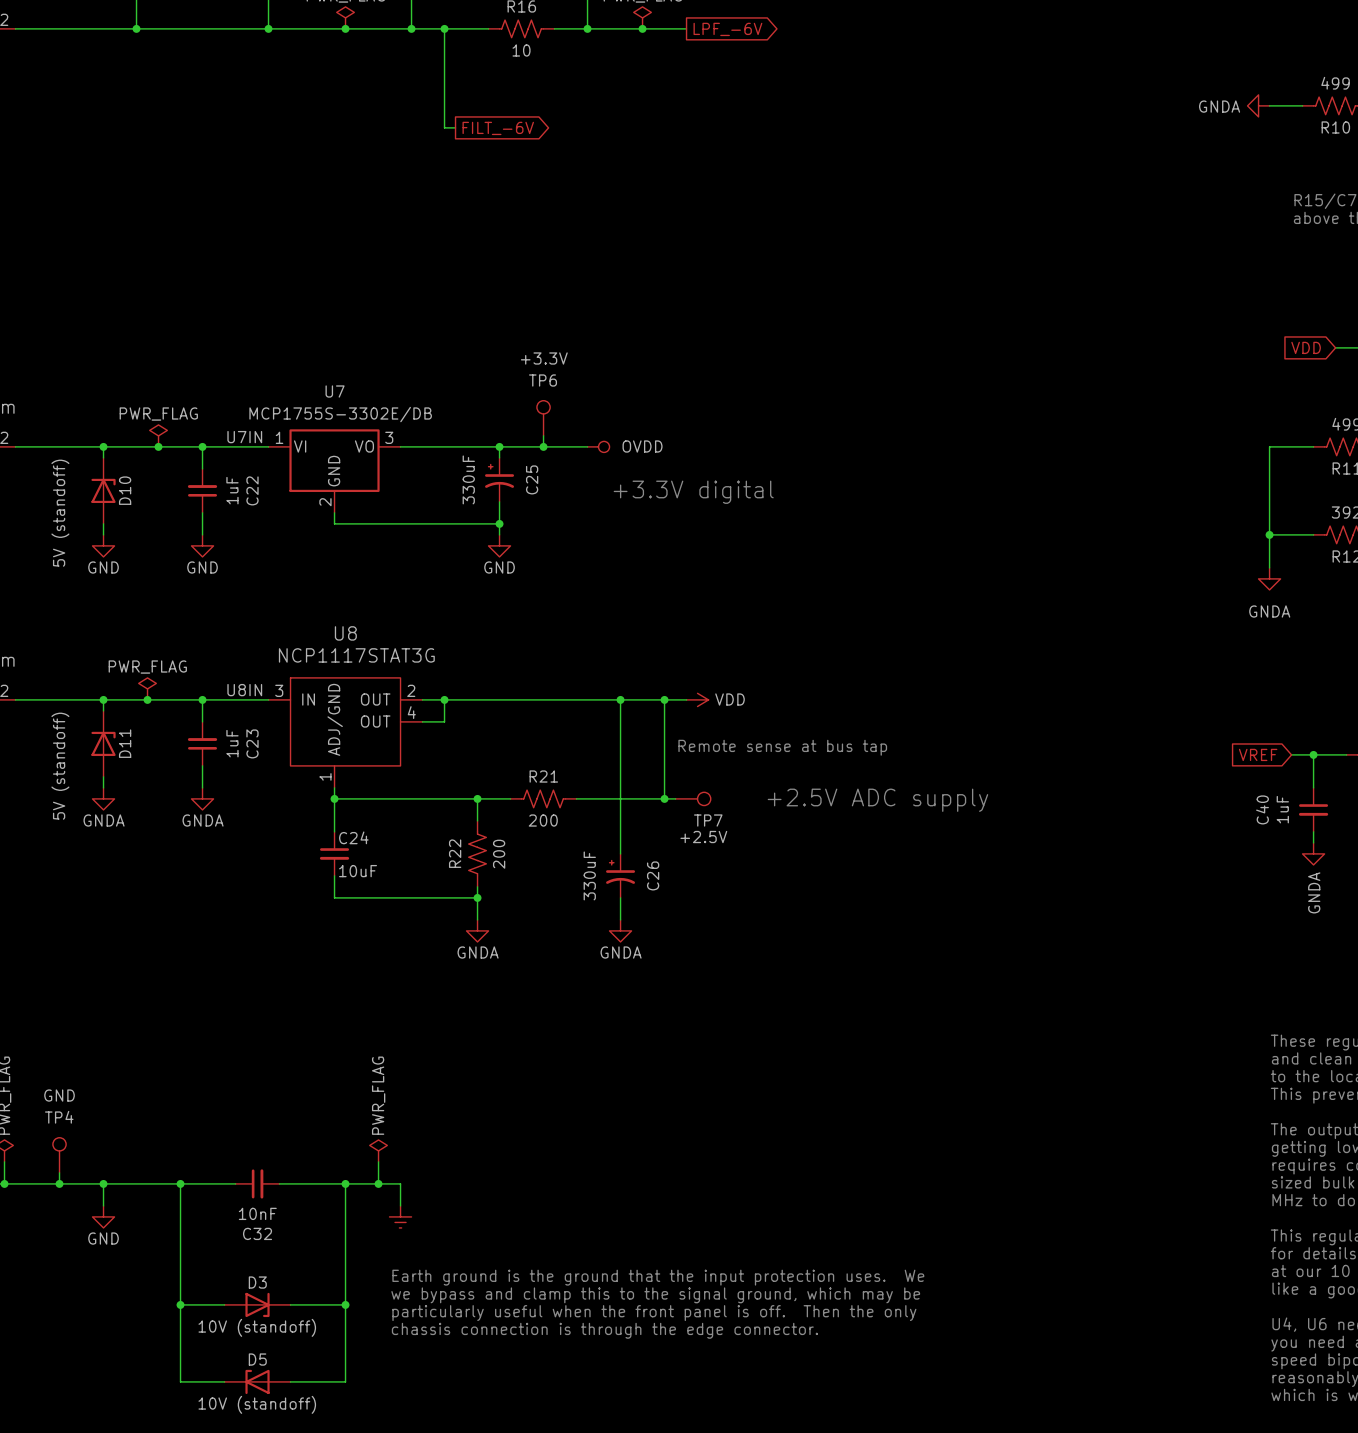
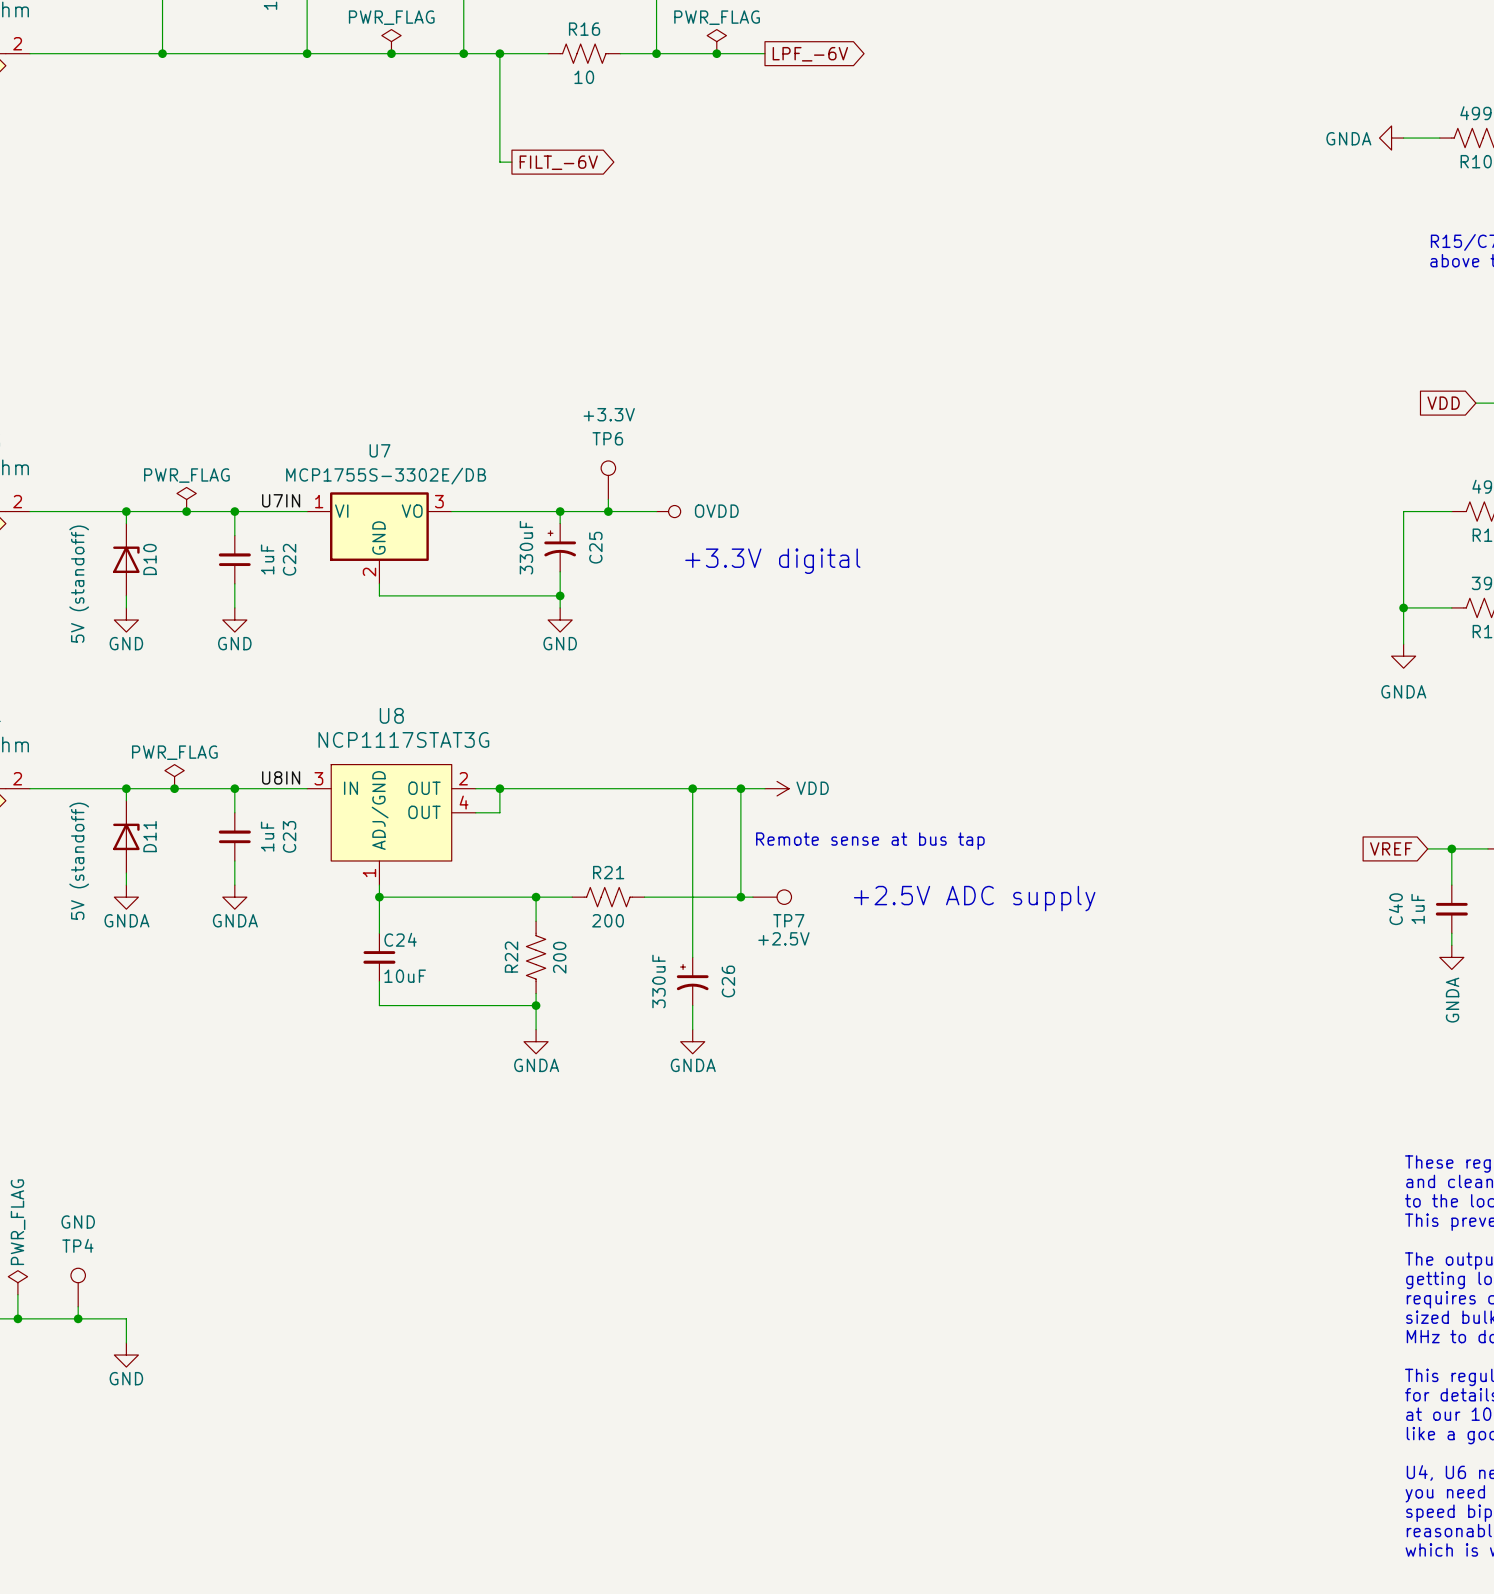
power symbol: PWR_FLAG (378, 1150) -> none
wire: (378, 1161) (378, 1183) -> none
wire: (103, 1183) (235, 1183) -> none
junction: (103, 1183) -> none
wire: (180, 1183) (180, 1381) (224, 1381) -> none
junction: (180, 1183) -> none
C32: 10nF (257, 1183) -> none
wire: (279, 1183) (400, 1183) (400, 1205) -> none
wire: (345, 1183) (345, 1381) (290, 1381) -> none
junction: (345, 1183) -> none
junction: (378, 1183) -> none
power symbol: (400, 1216) -> none
text: Earth ground is the ground that the input protection uses. We (658, 1277) -> none
text: we bypass and clamp this to the signal ground, which may be (655, 1295) -> none
wire: (180, 1304) (224, 1304) -> none
junction: (180, 1304) -> none
D3: 10V (standoff) (257, 1304) -> none
wire: (290, 1304) (345, 1304) -> none
junction: (345, 1304) -> none
text: particularly useful when the front panel is off. Then the only (654, 1313) -> none
text: chassis connection is through the edge connector. (604, 1330) -> none
D5: 10V (standoff) (257, 1381) -> none

